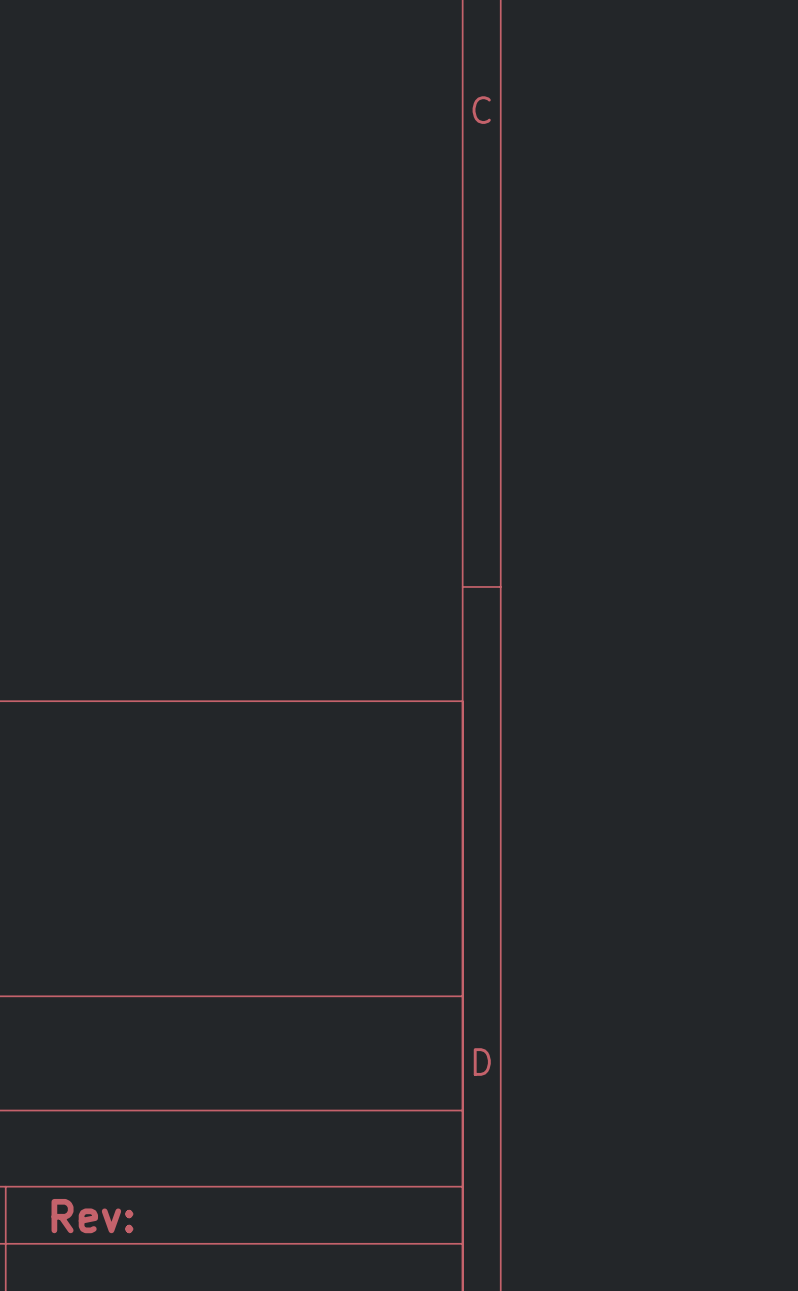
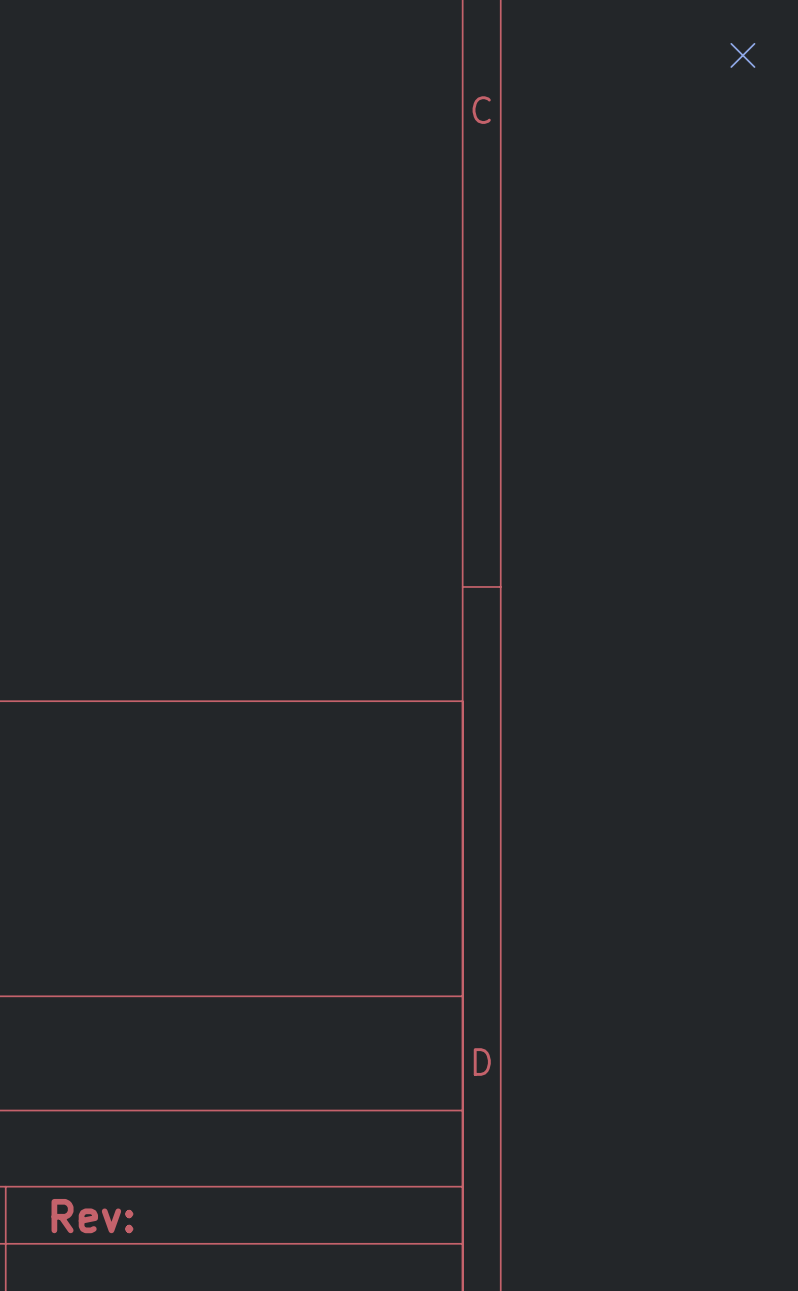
no-connect mark: none -> (742, 55)

